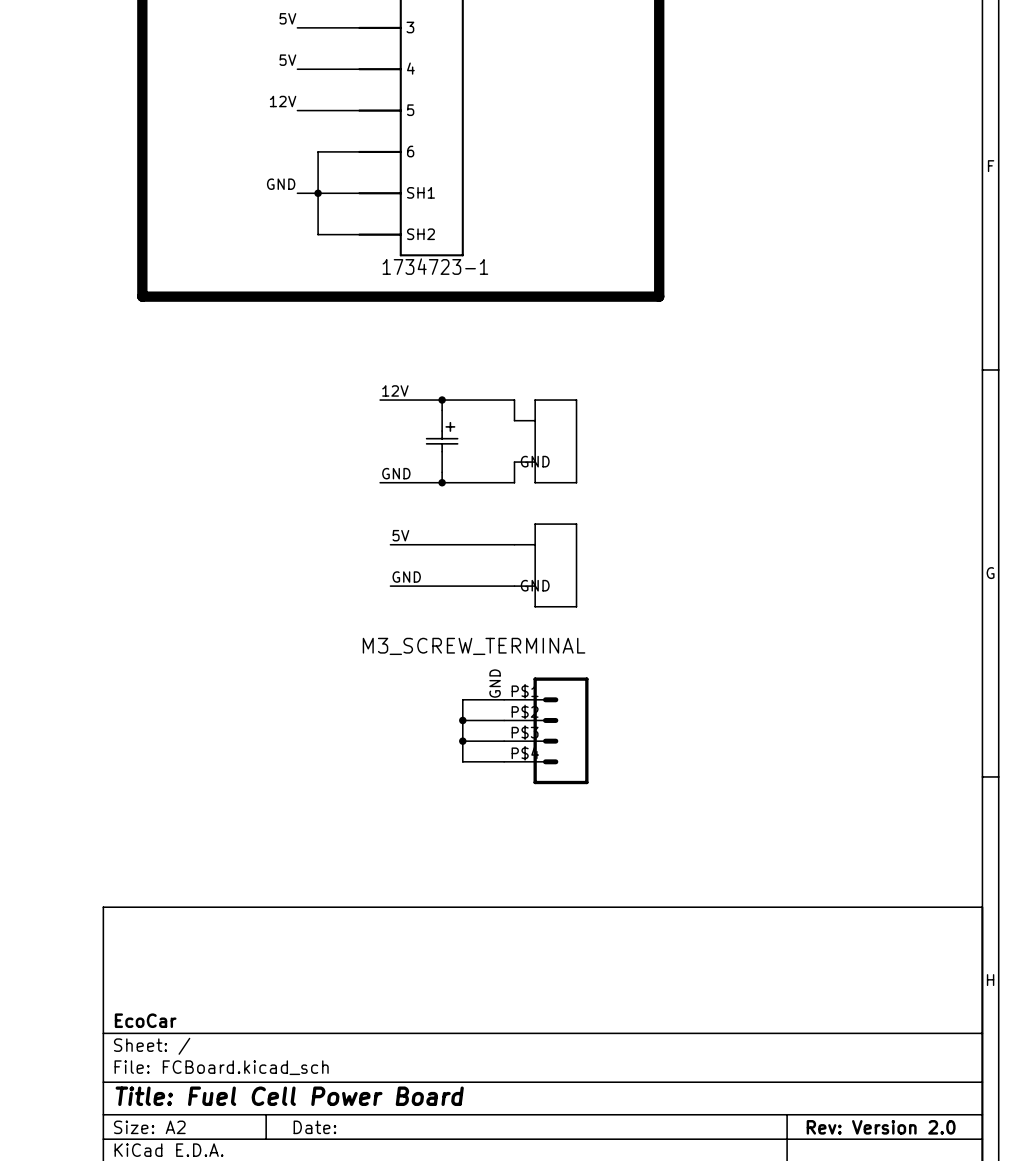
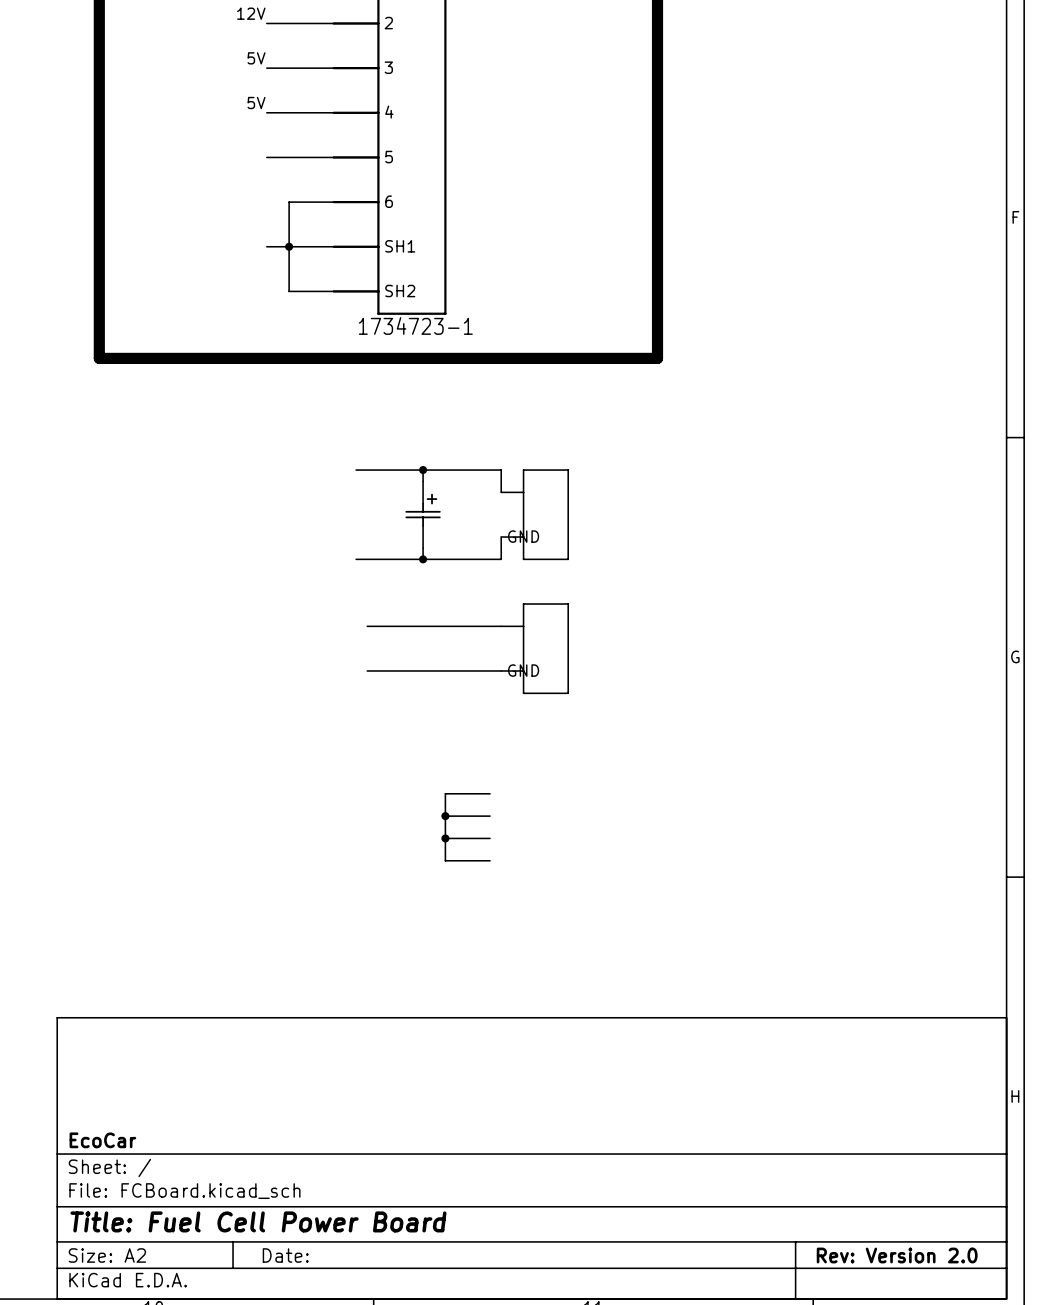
label: 12V (283, 101) -> none
label: GND (281, 184) -> none
label: 12V (395, 390) -> none
label: GND (396, 473) -> none
label: 5V (400, 535) -> none
label: GND (406, 577) -> none
label: GND (495, 683) -> none
part: M3_SCREW_TERMINAL (546, 730) -> none

